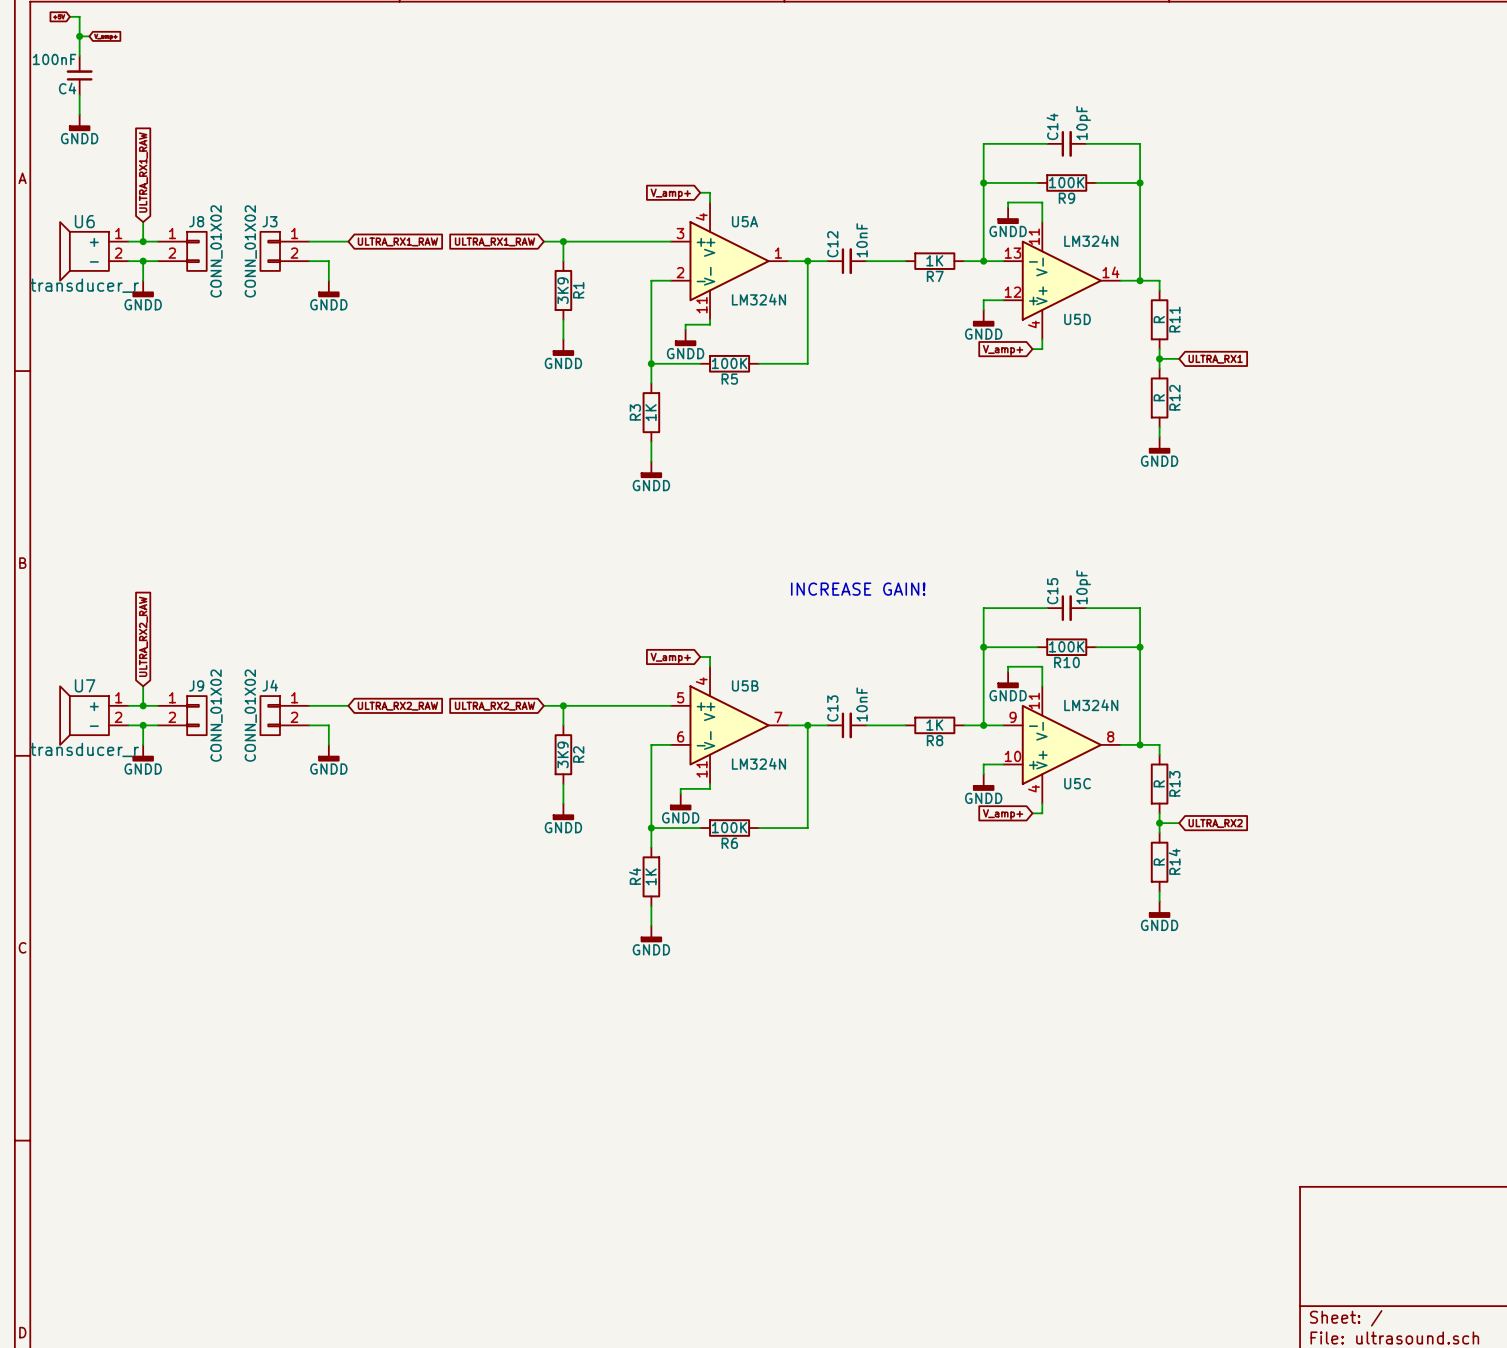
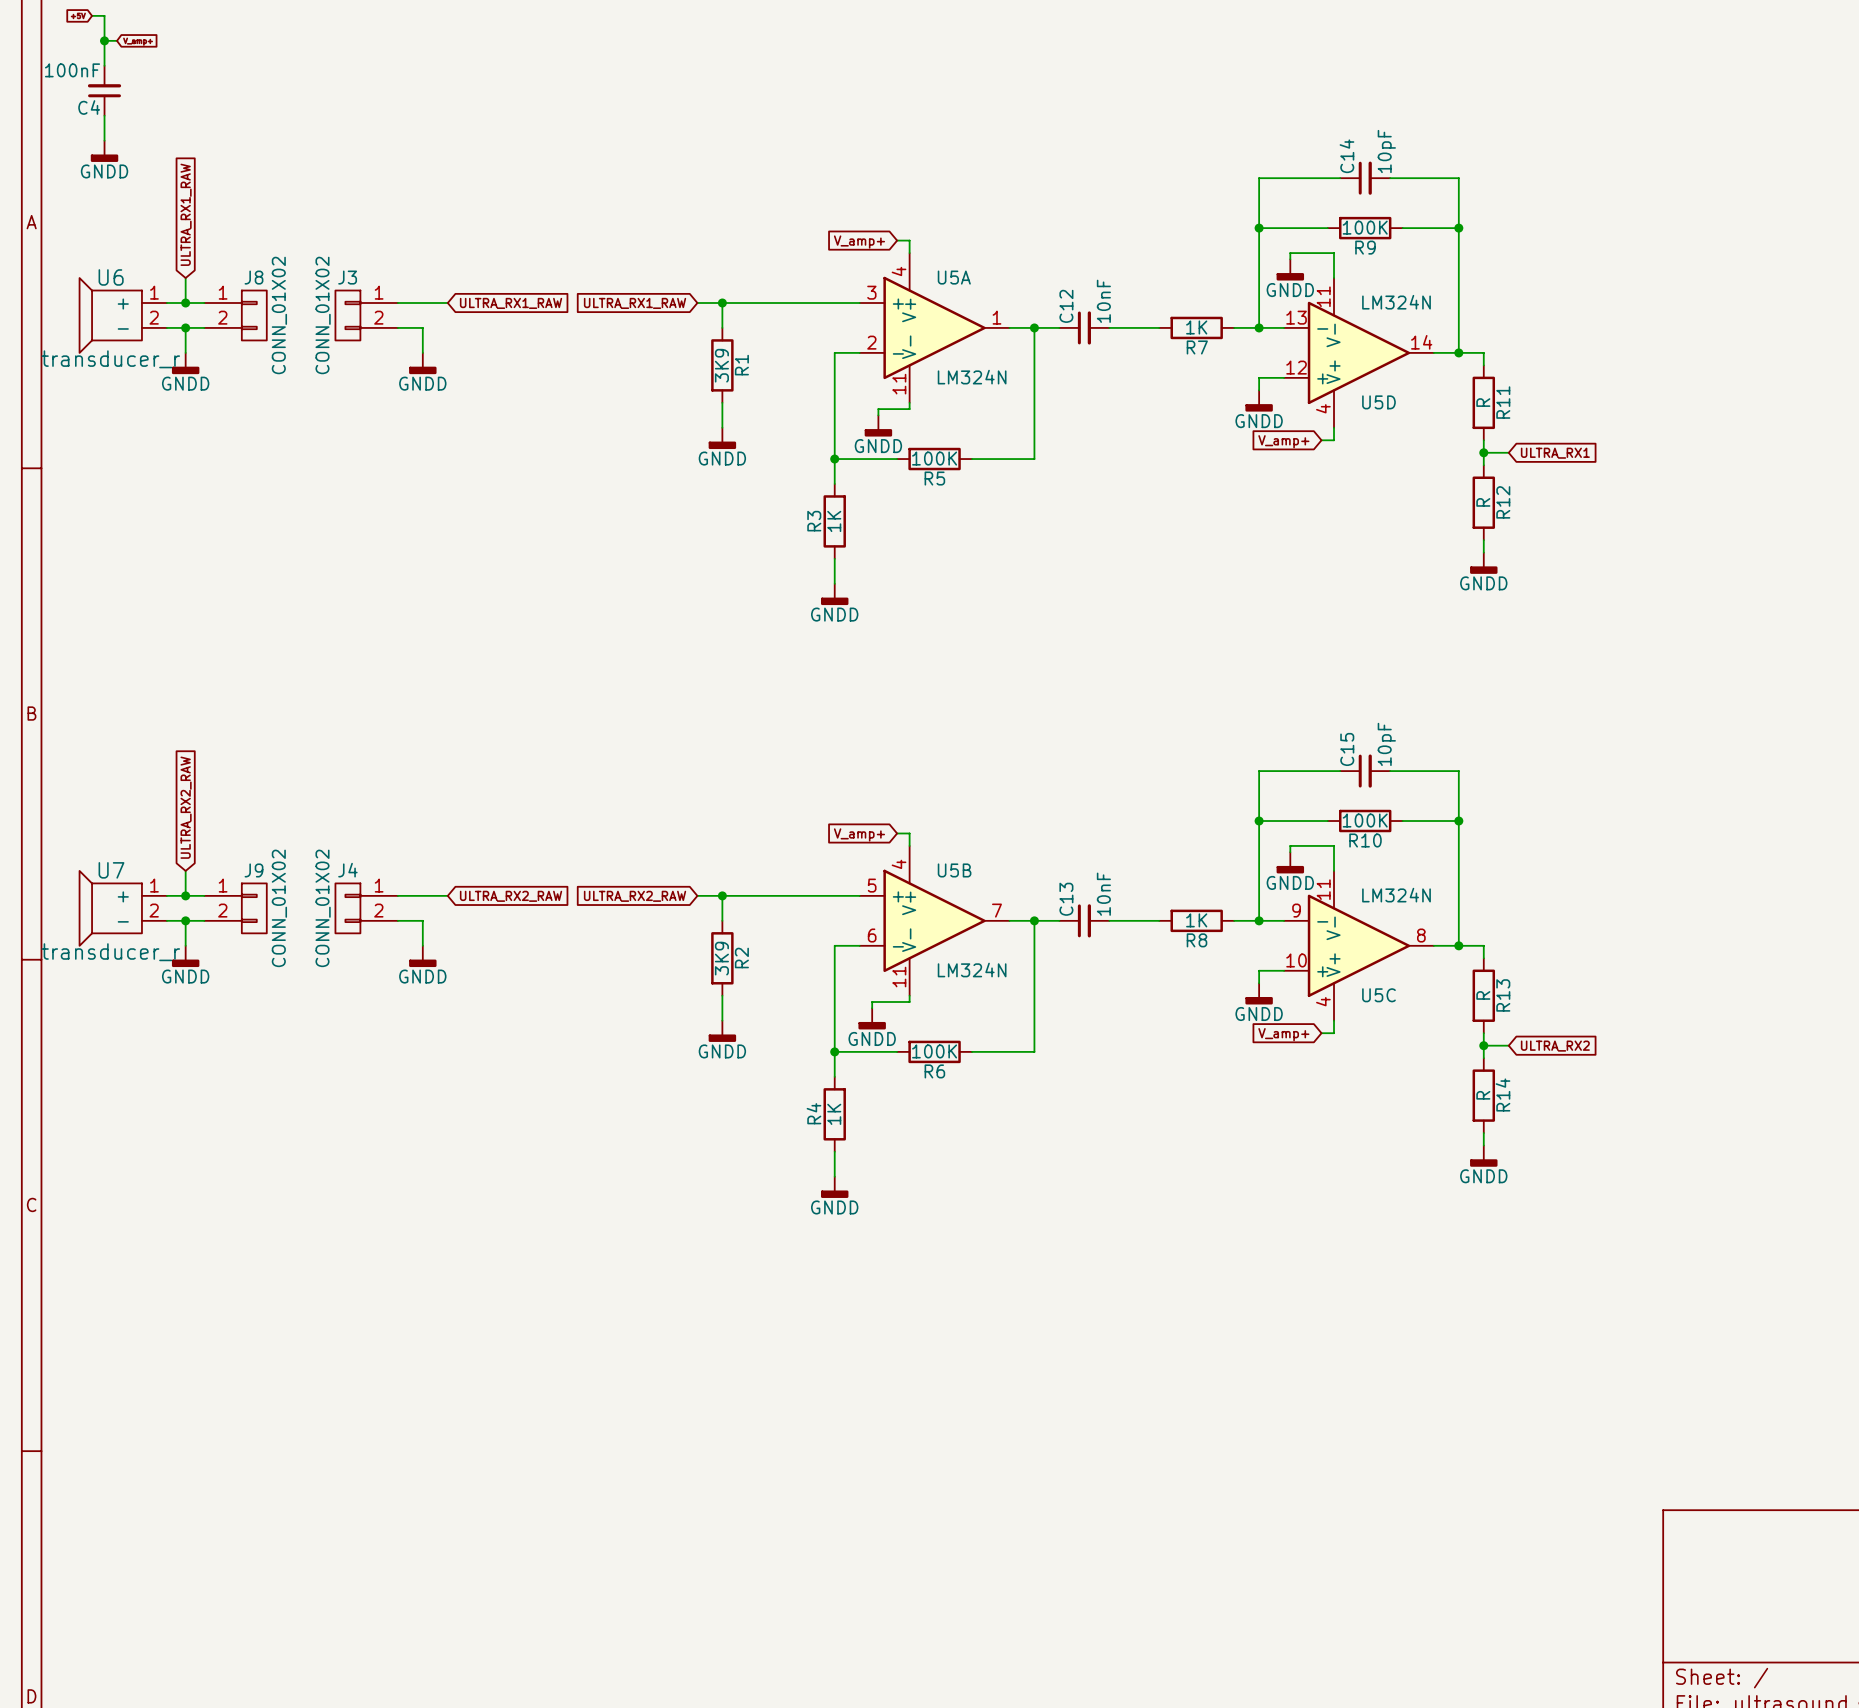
text: INCREASE GAIN! (858, 589) -> none

